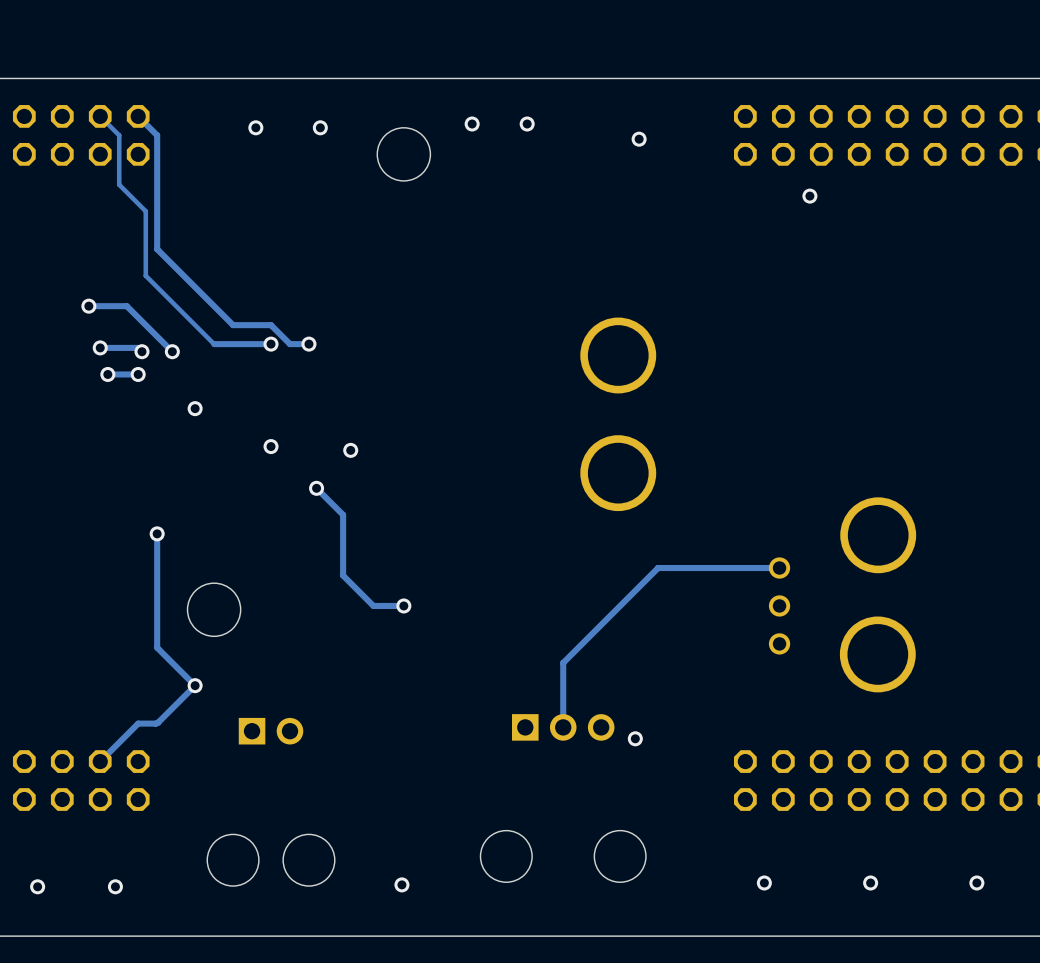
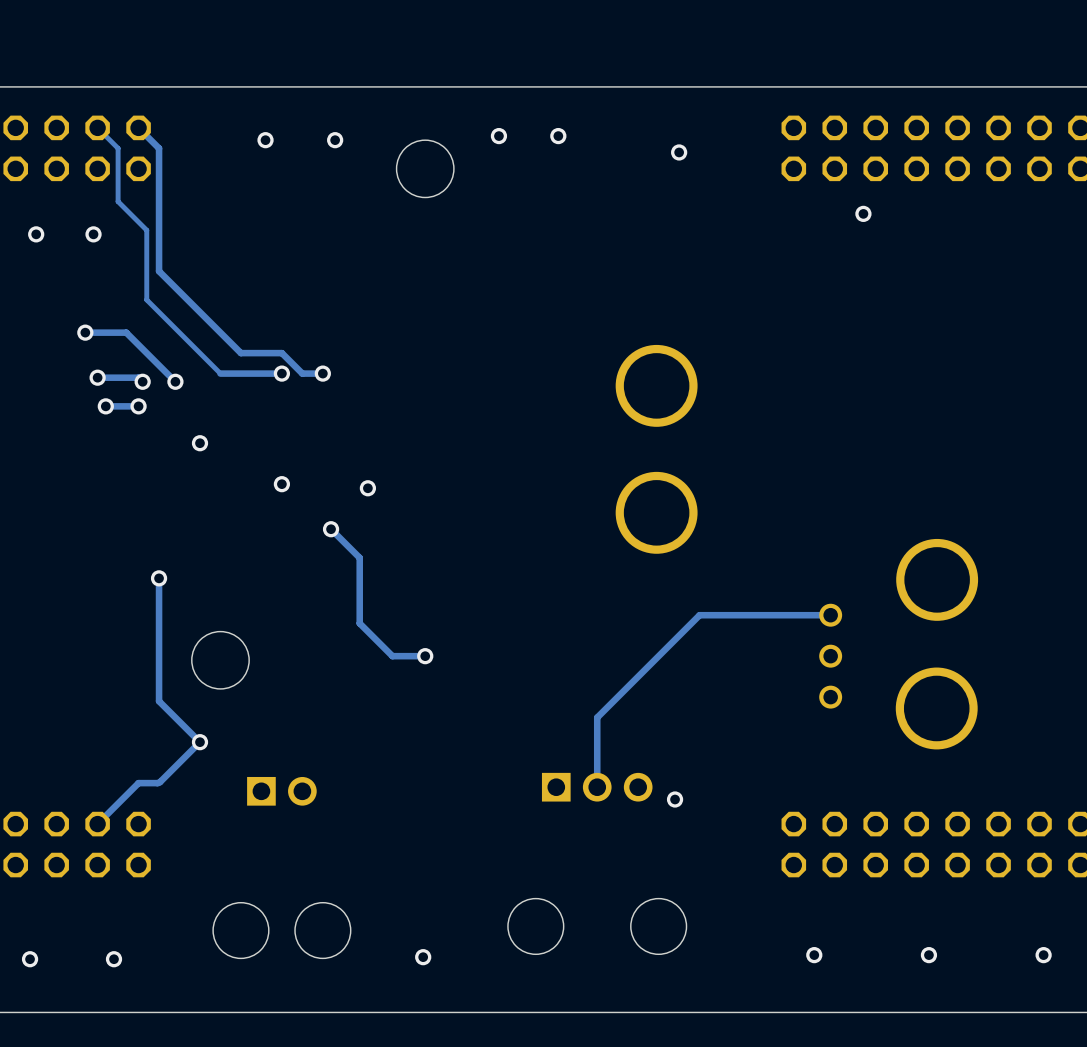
via: none -> (36, 234)
via: none -> (93, 234)

